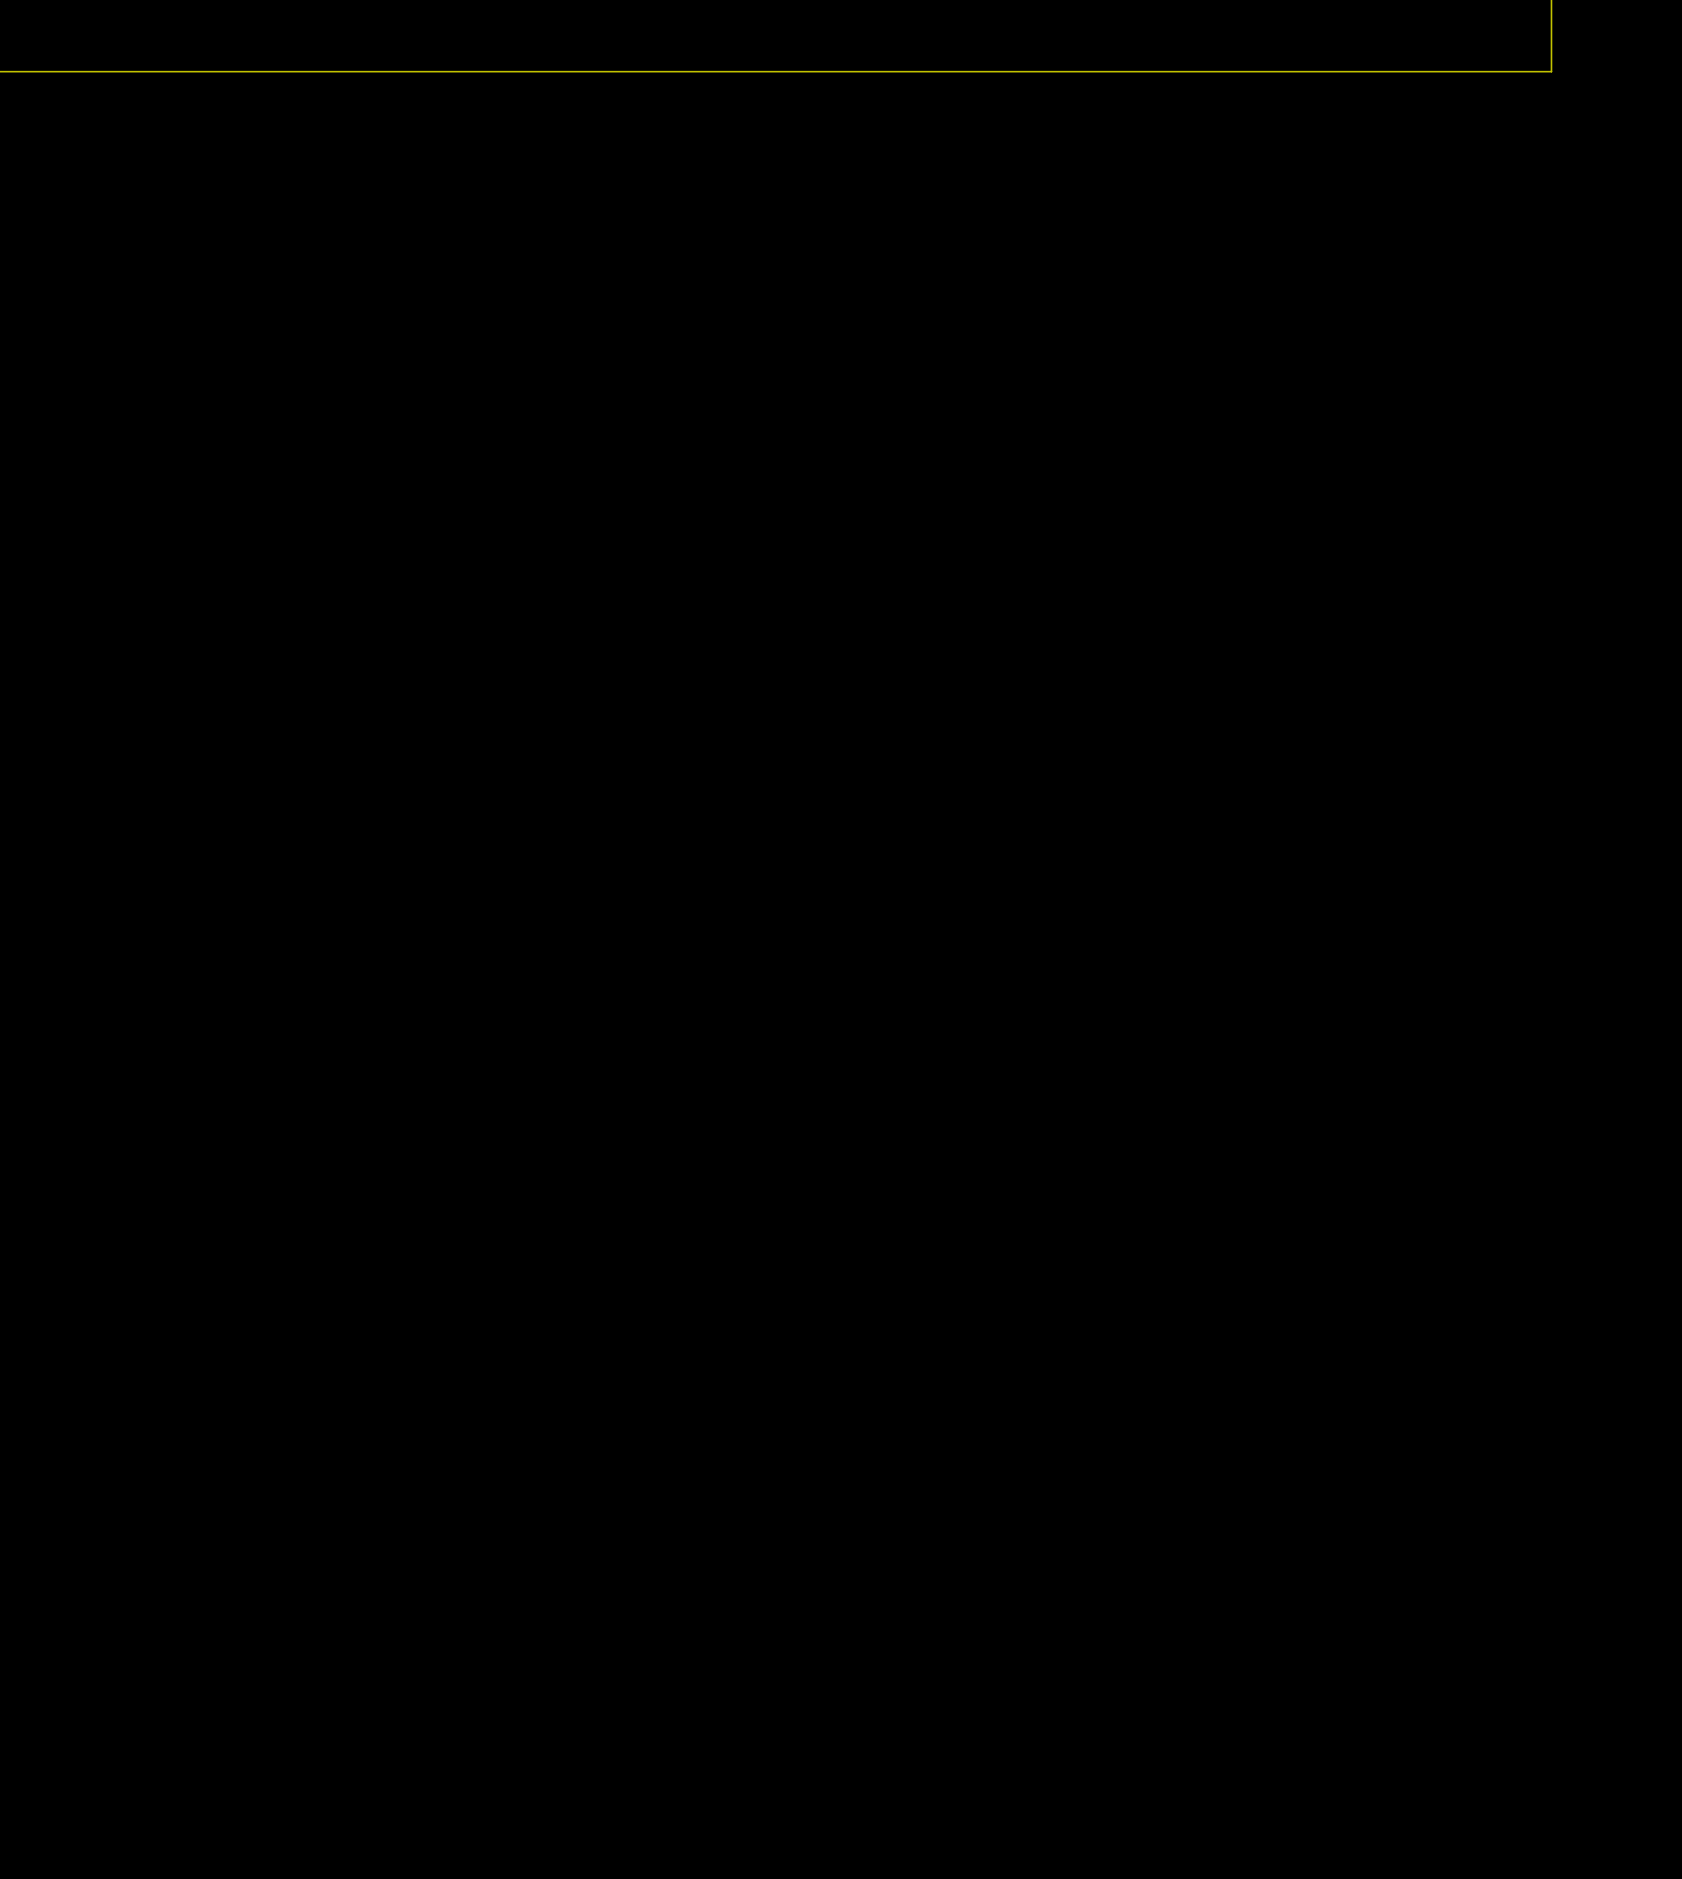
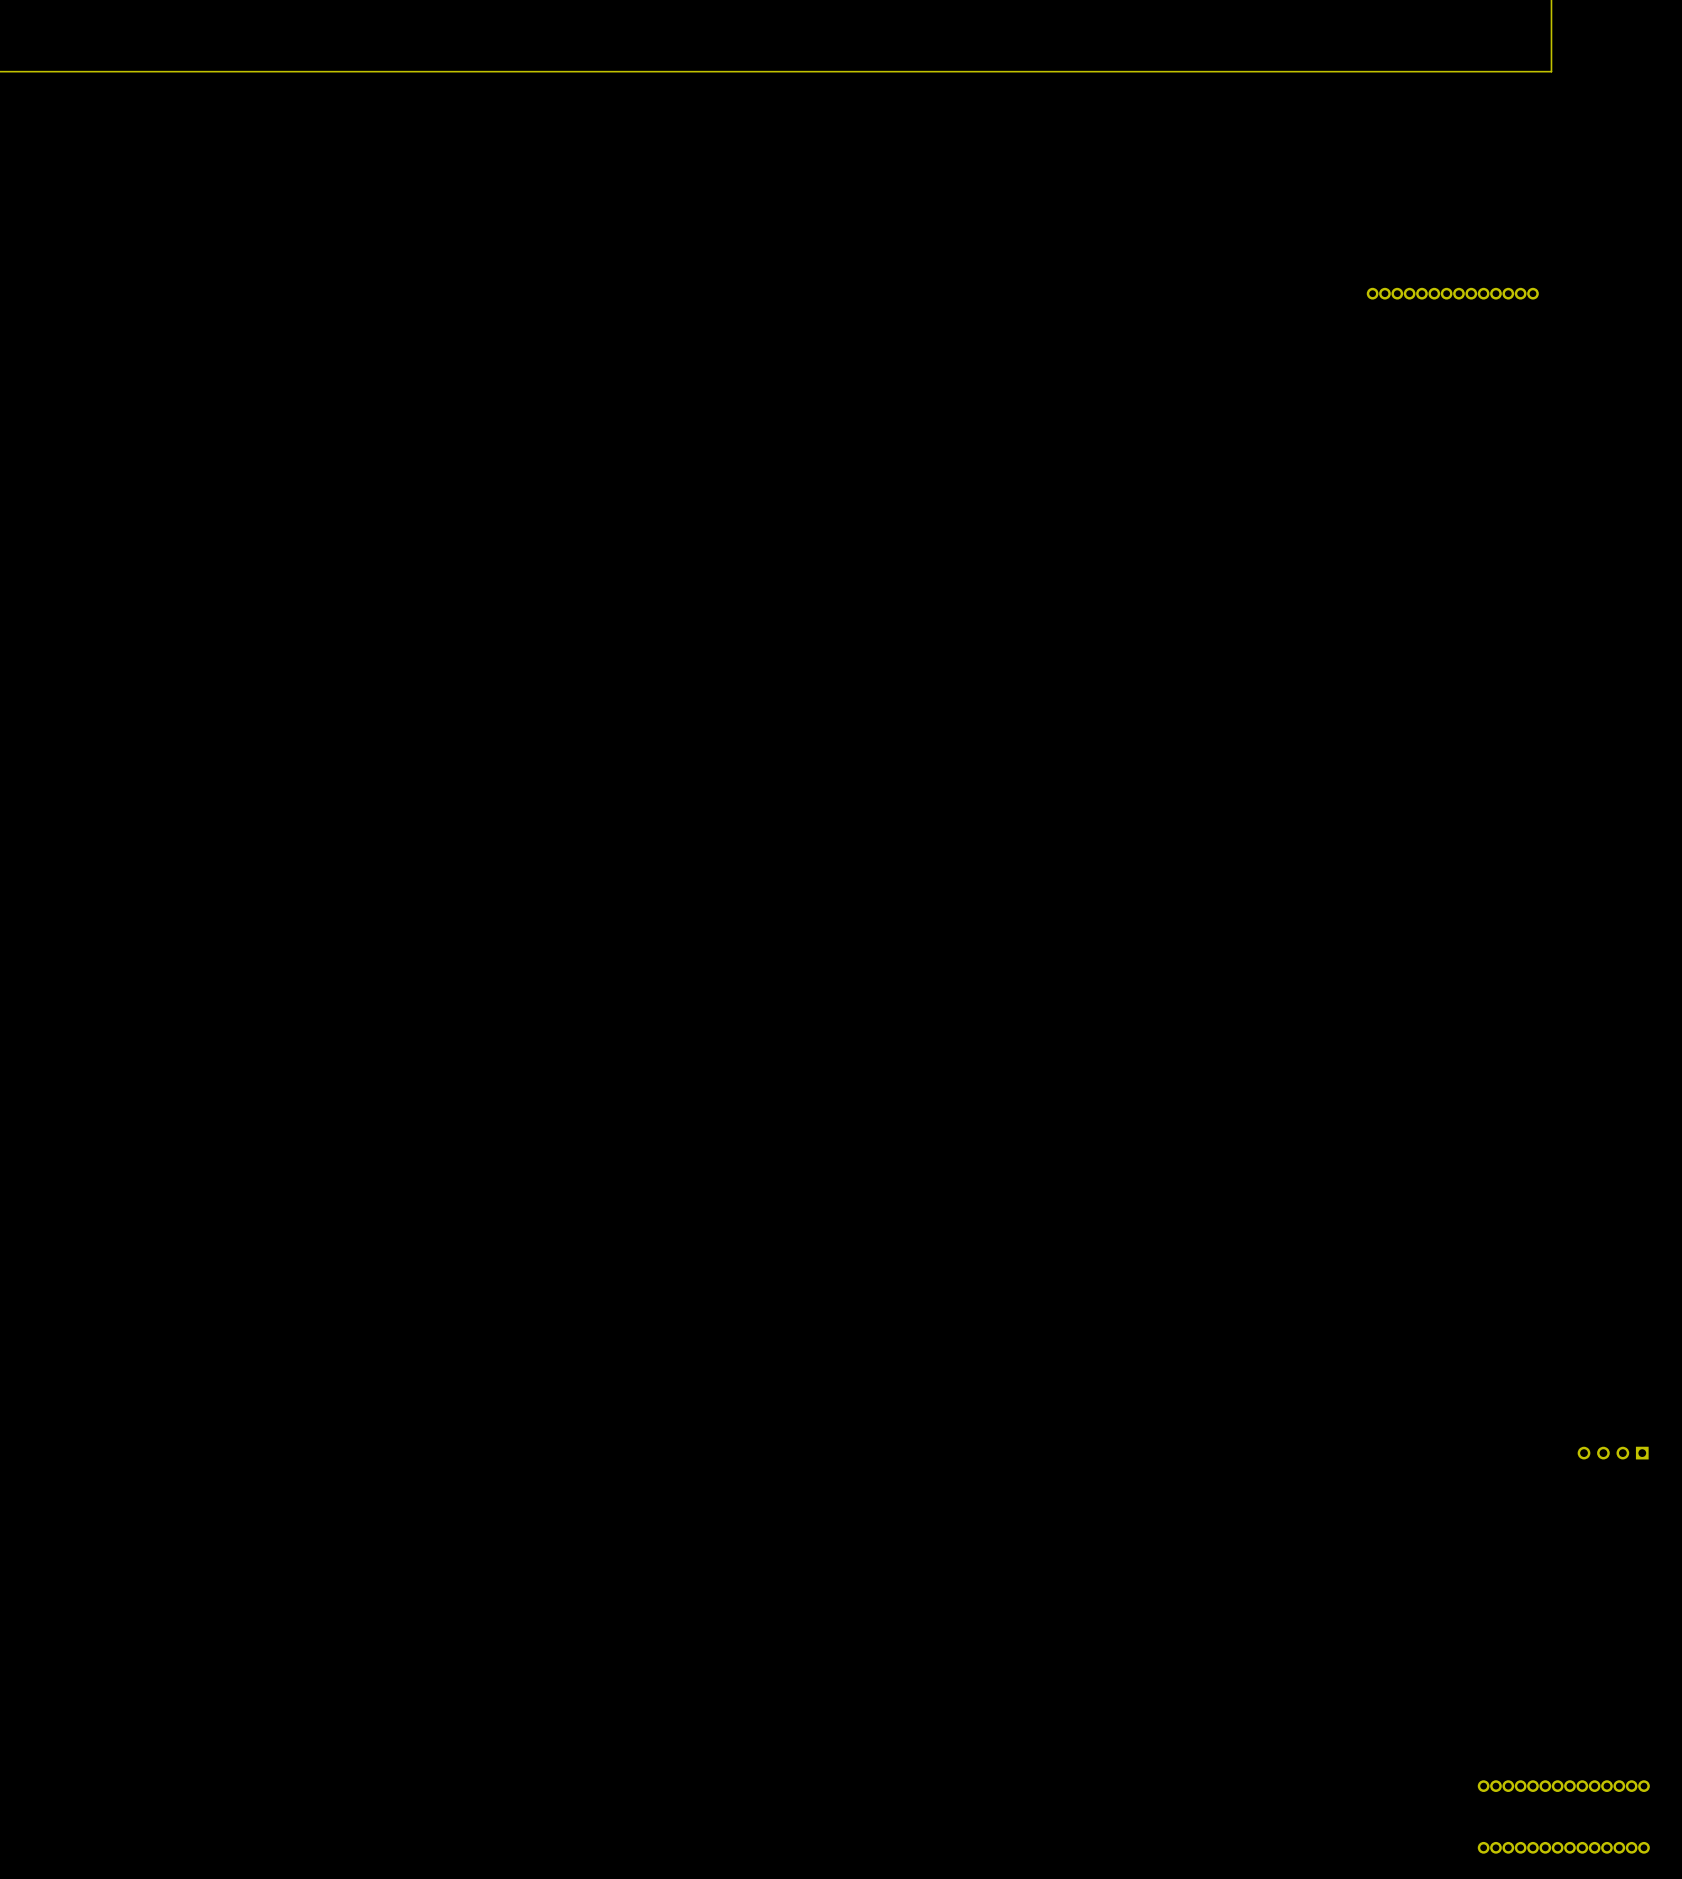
part: none -> (1452, 293)
part: none -> (1613, 1453)
part: none -> (1563, 1786)
part: none -> (1563, 1847)

